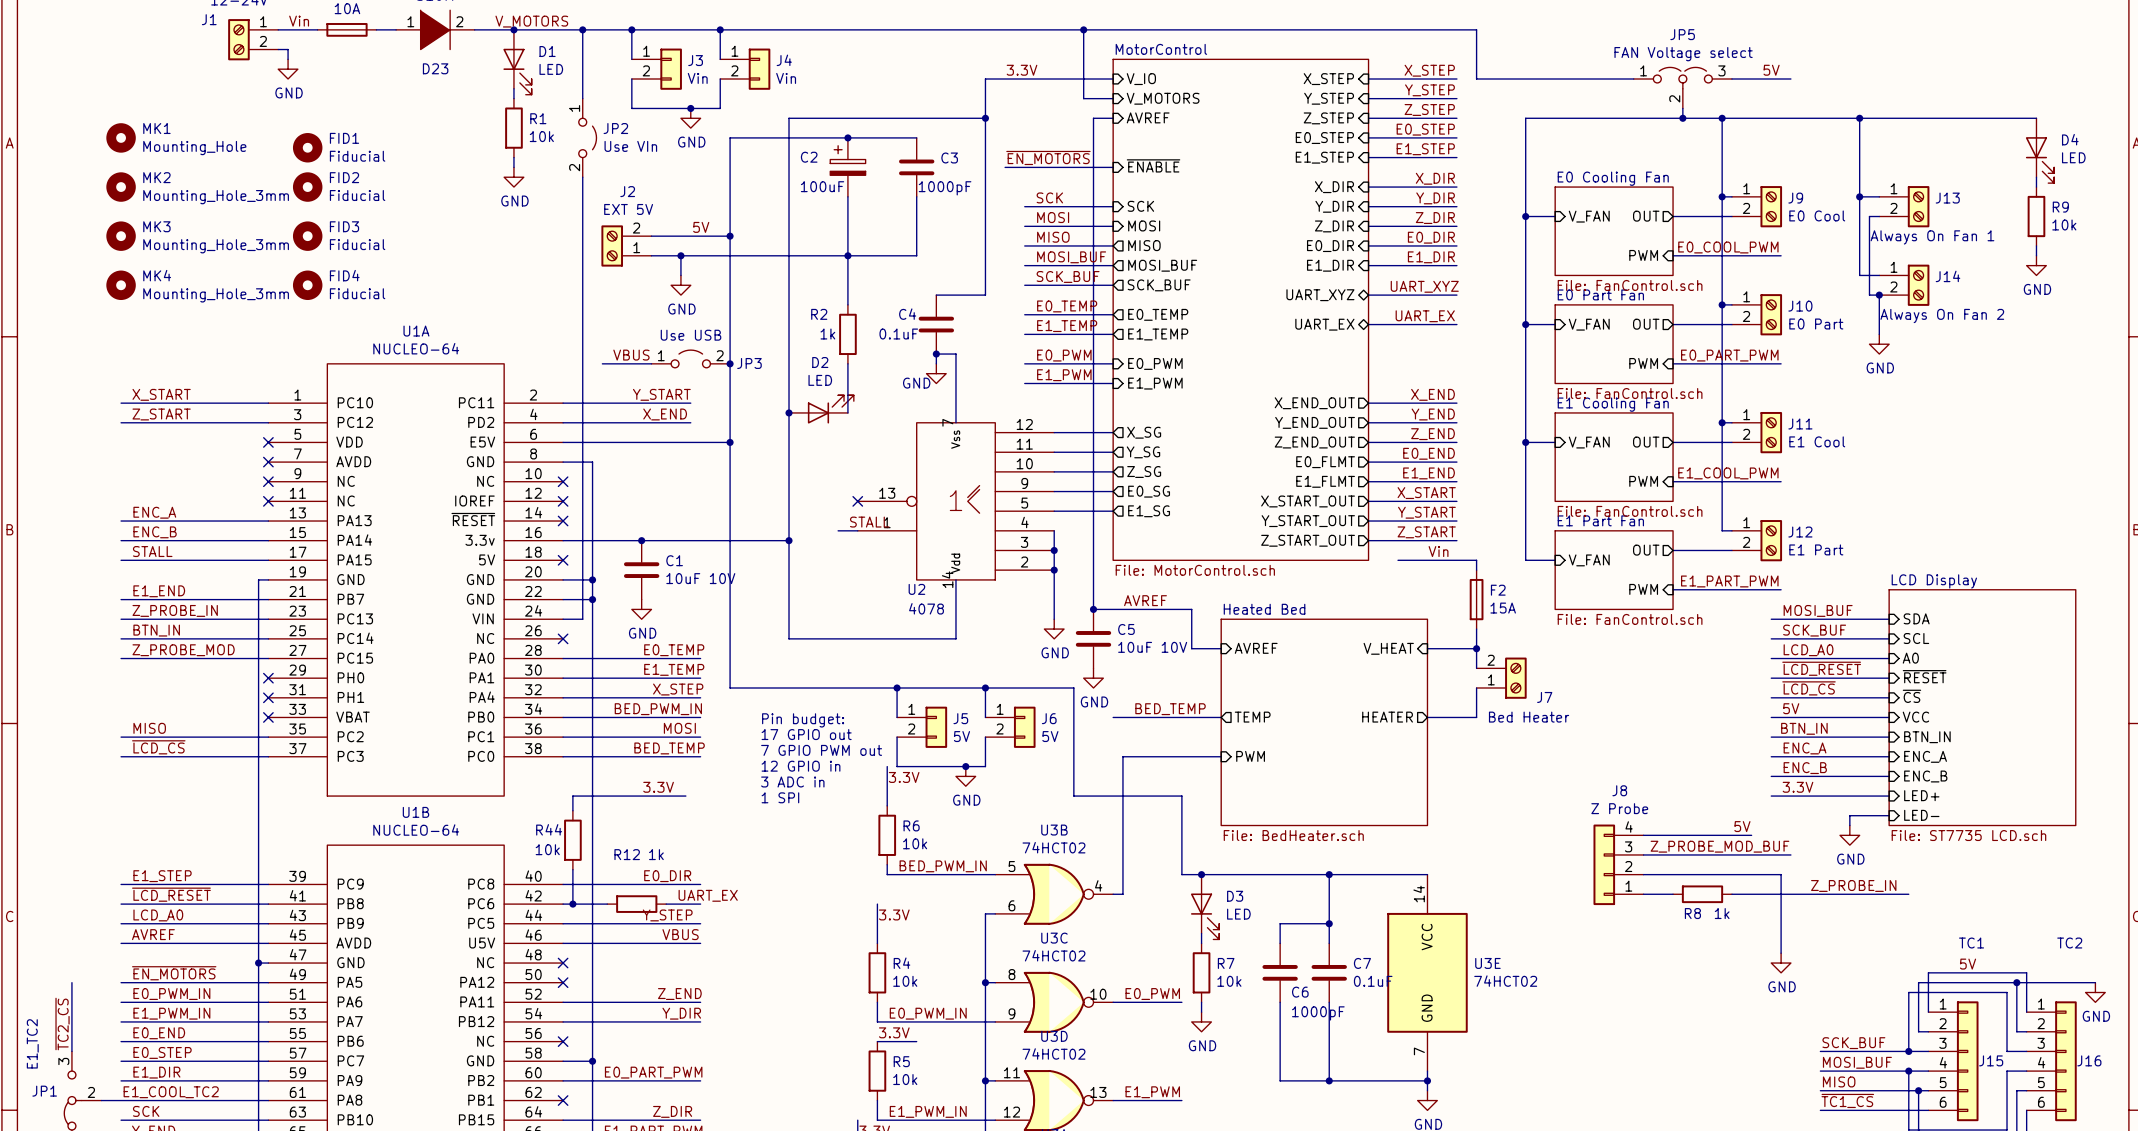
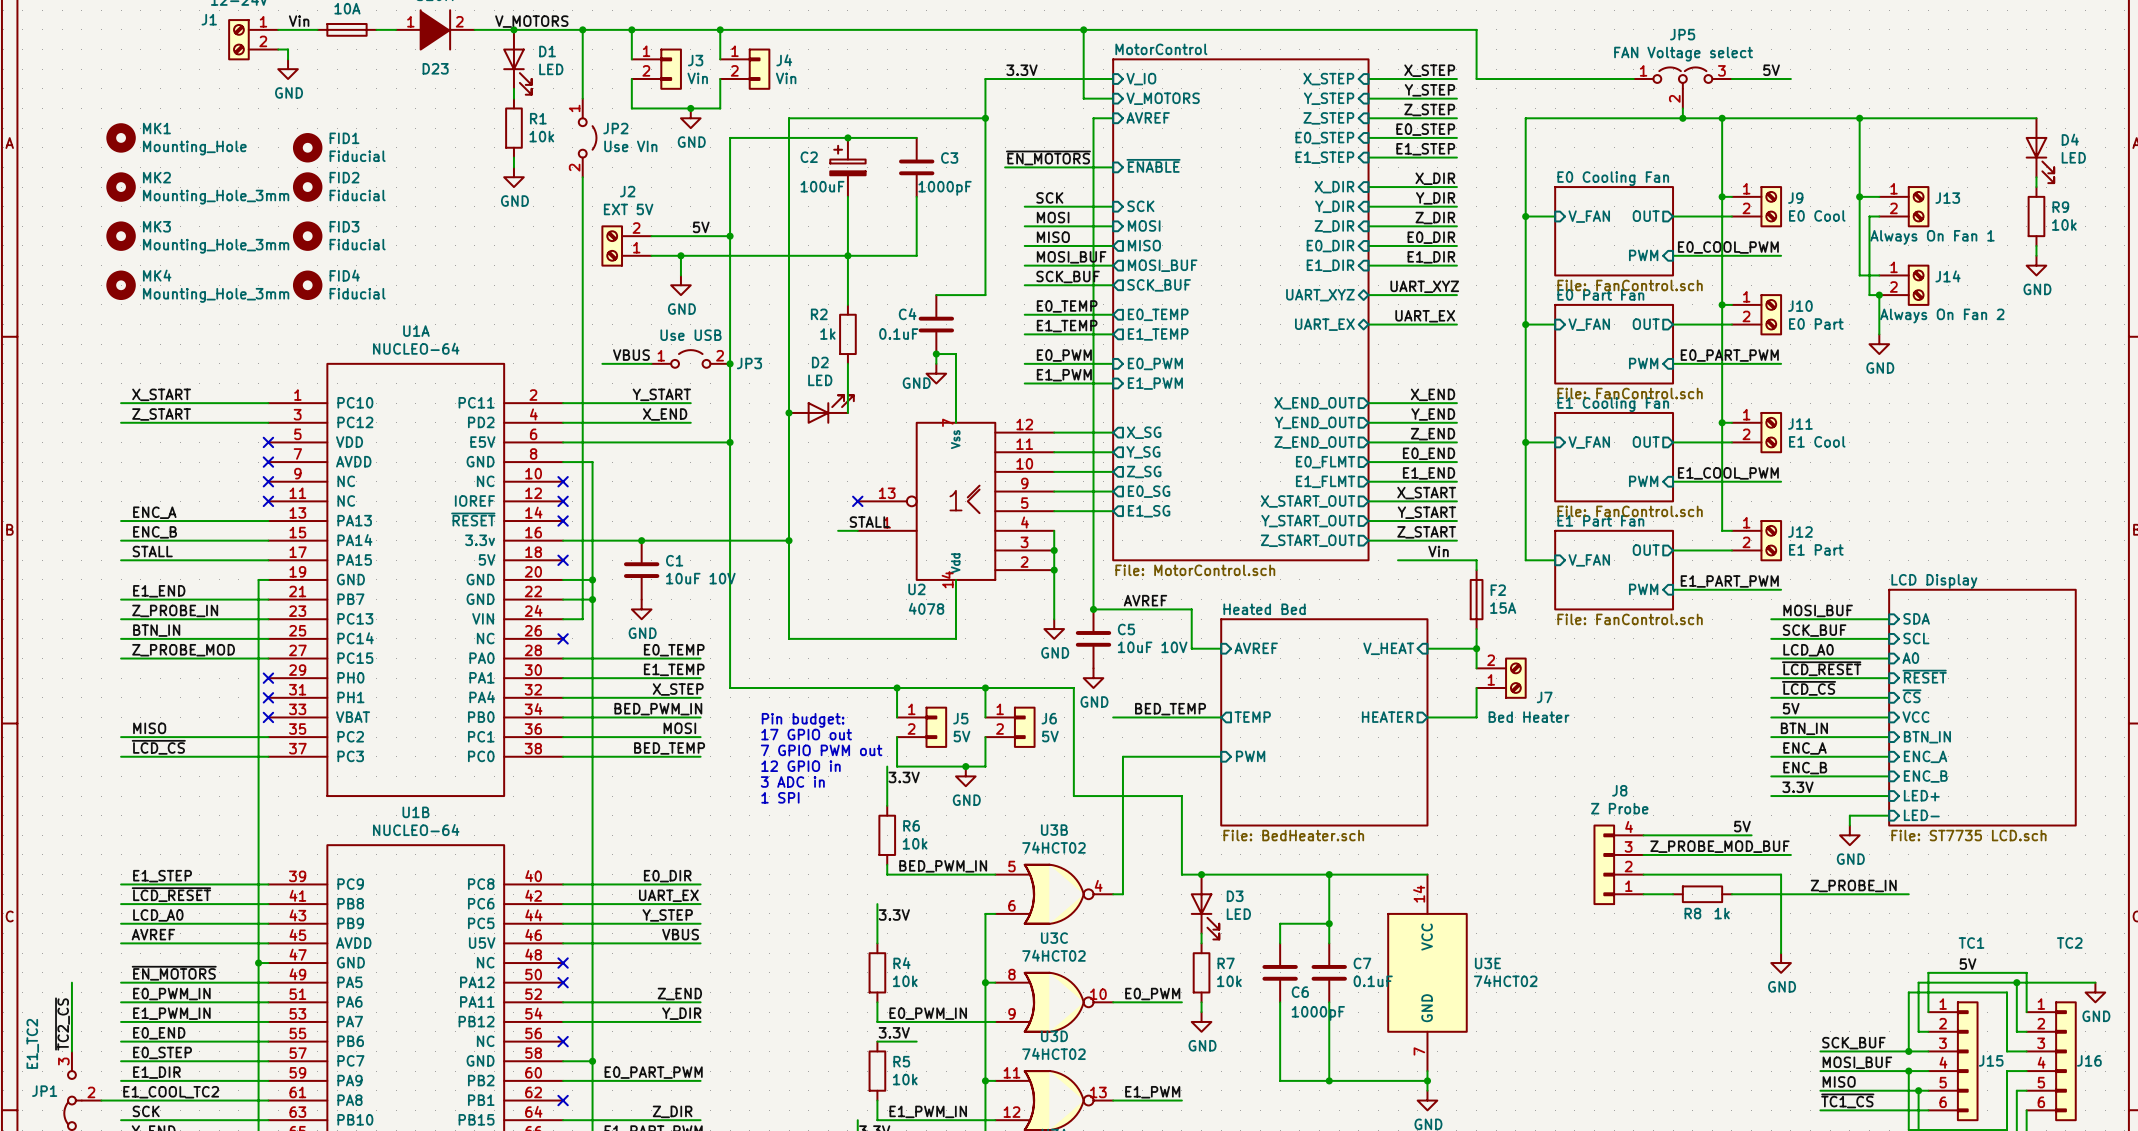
label: 3.3V (658, 787) -> none
wire: (685, 796) (572, 796) (572, 810) -> none
R44: 10k (572, 840) -> none
wire: (572, 869) (572, 904) -> none
label position: UART_EX (708, 895) -> UART_EX (668, 895)
junction: (572, 904) -> none
wire: none -> (607, 904) (666, 904)
R12: 1k (636, 904) -> none

